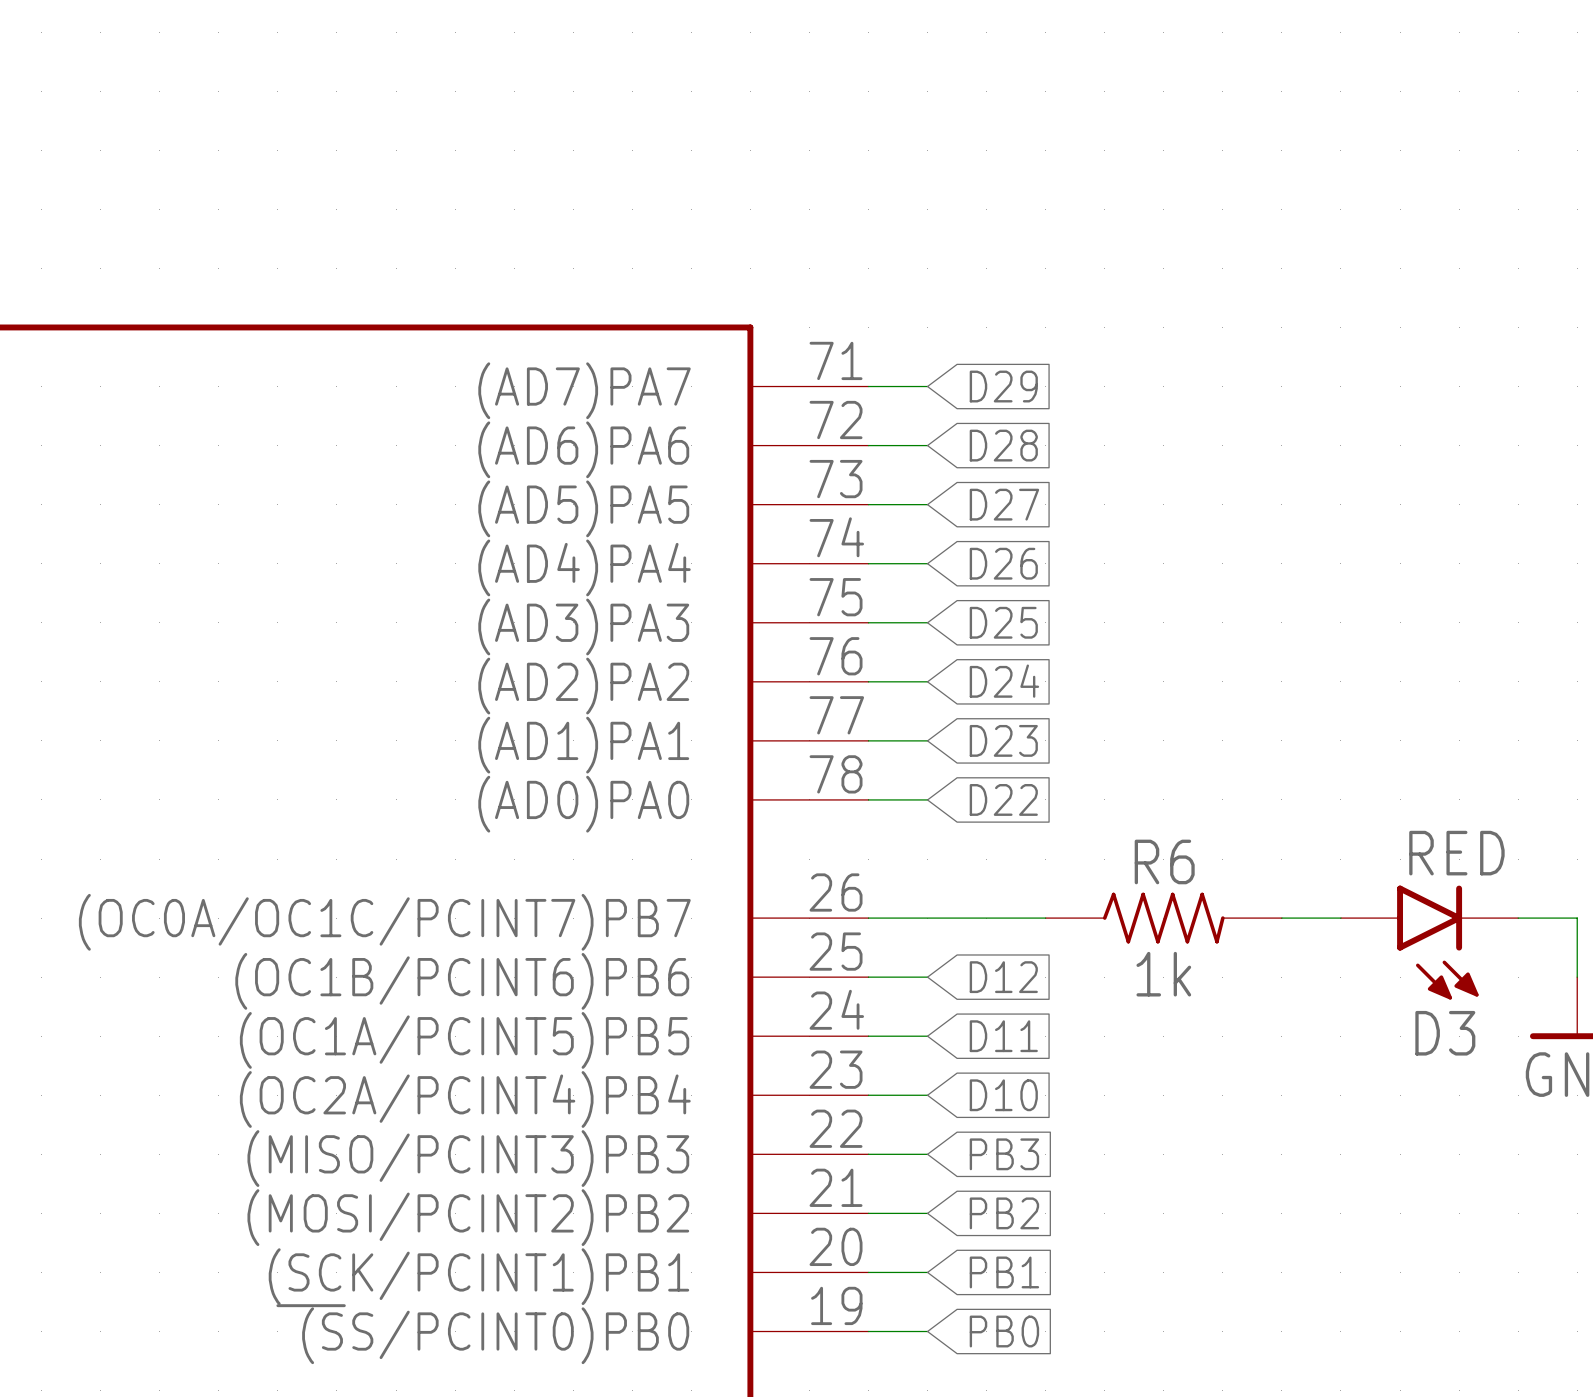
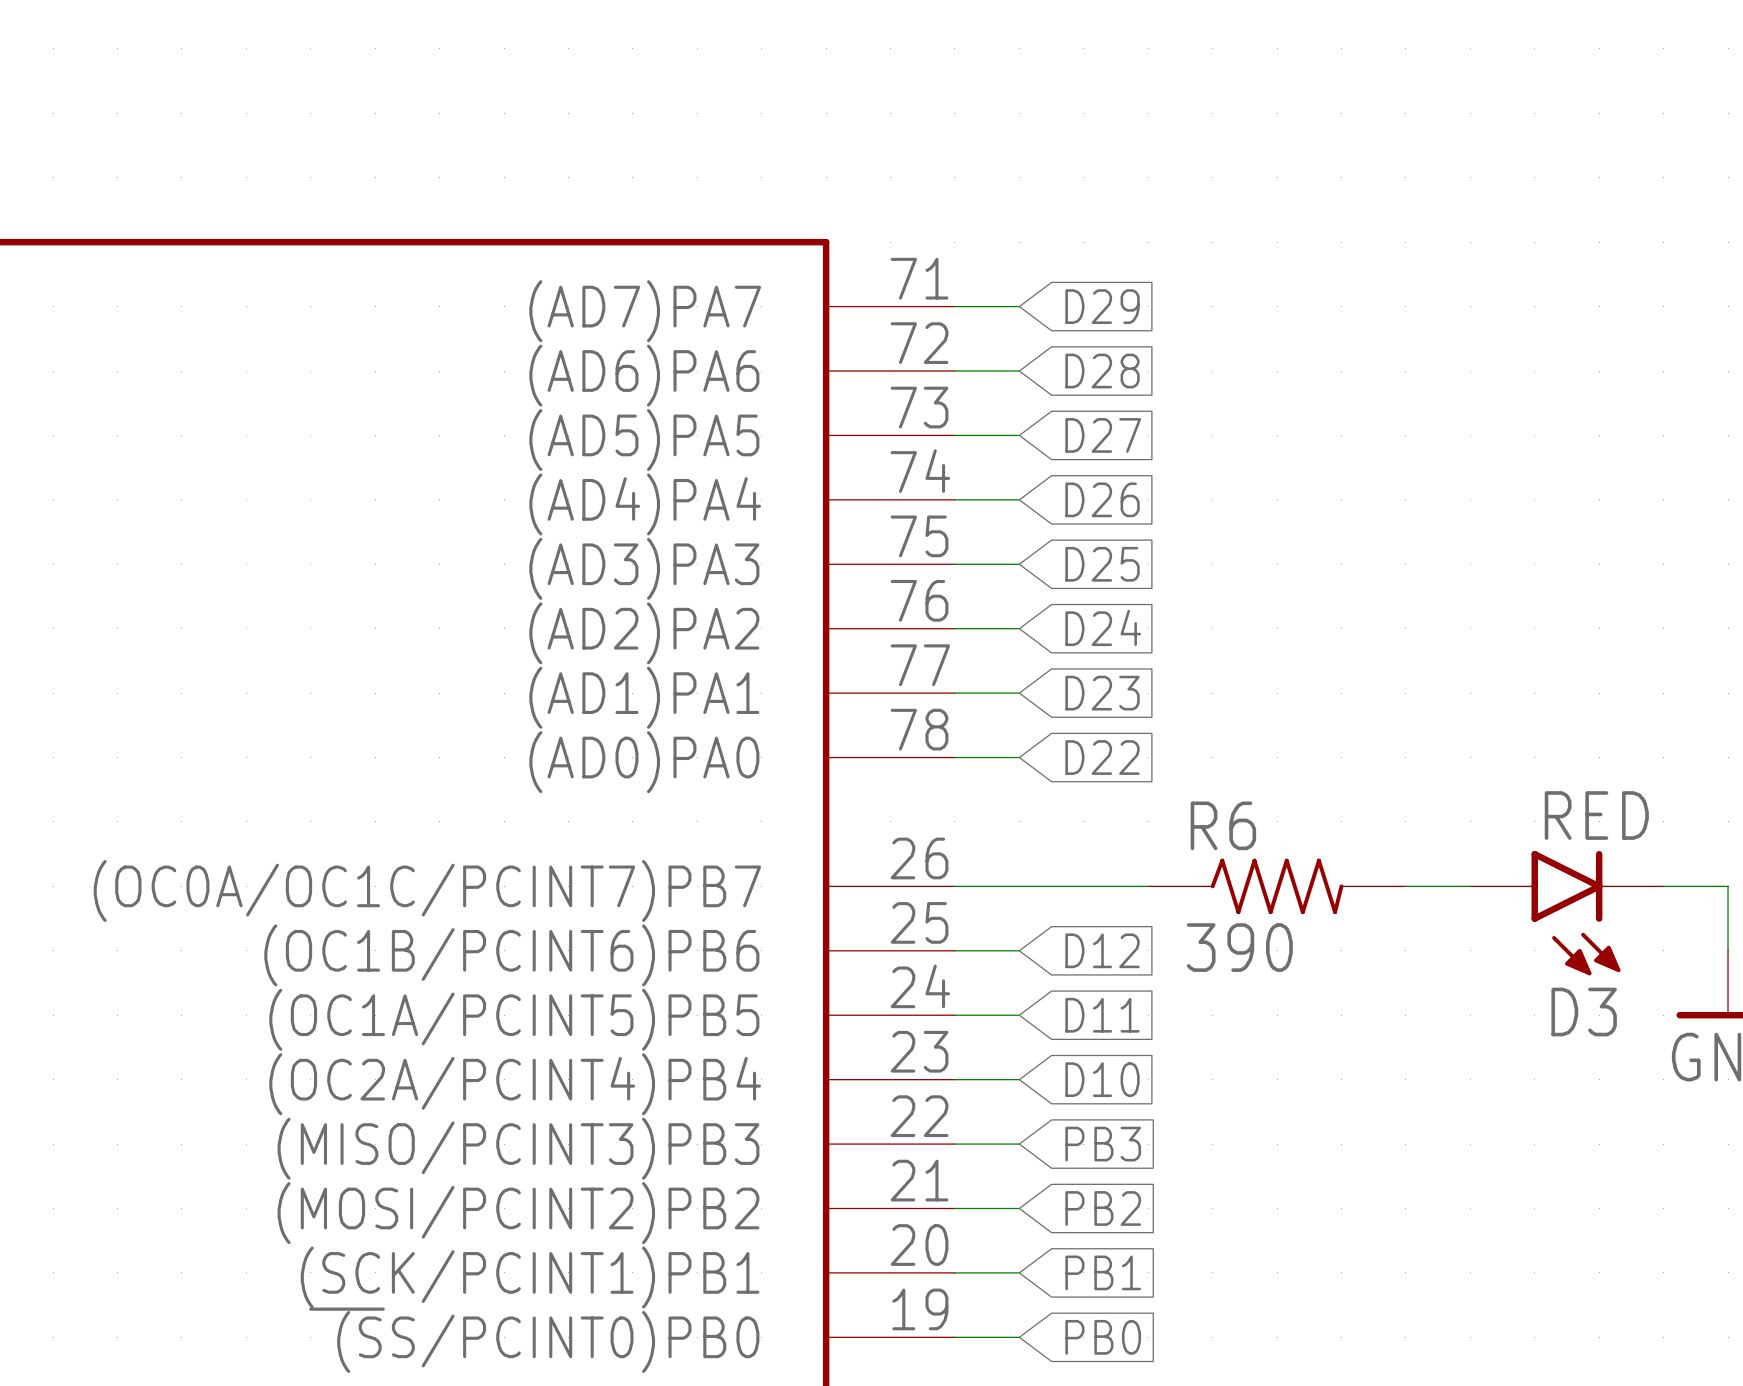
R6 name position: R6 (1164, 861) -> R6 (1223, 825)
R6 value: 1k (1163, 974) -> 390 (1239, 947)

